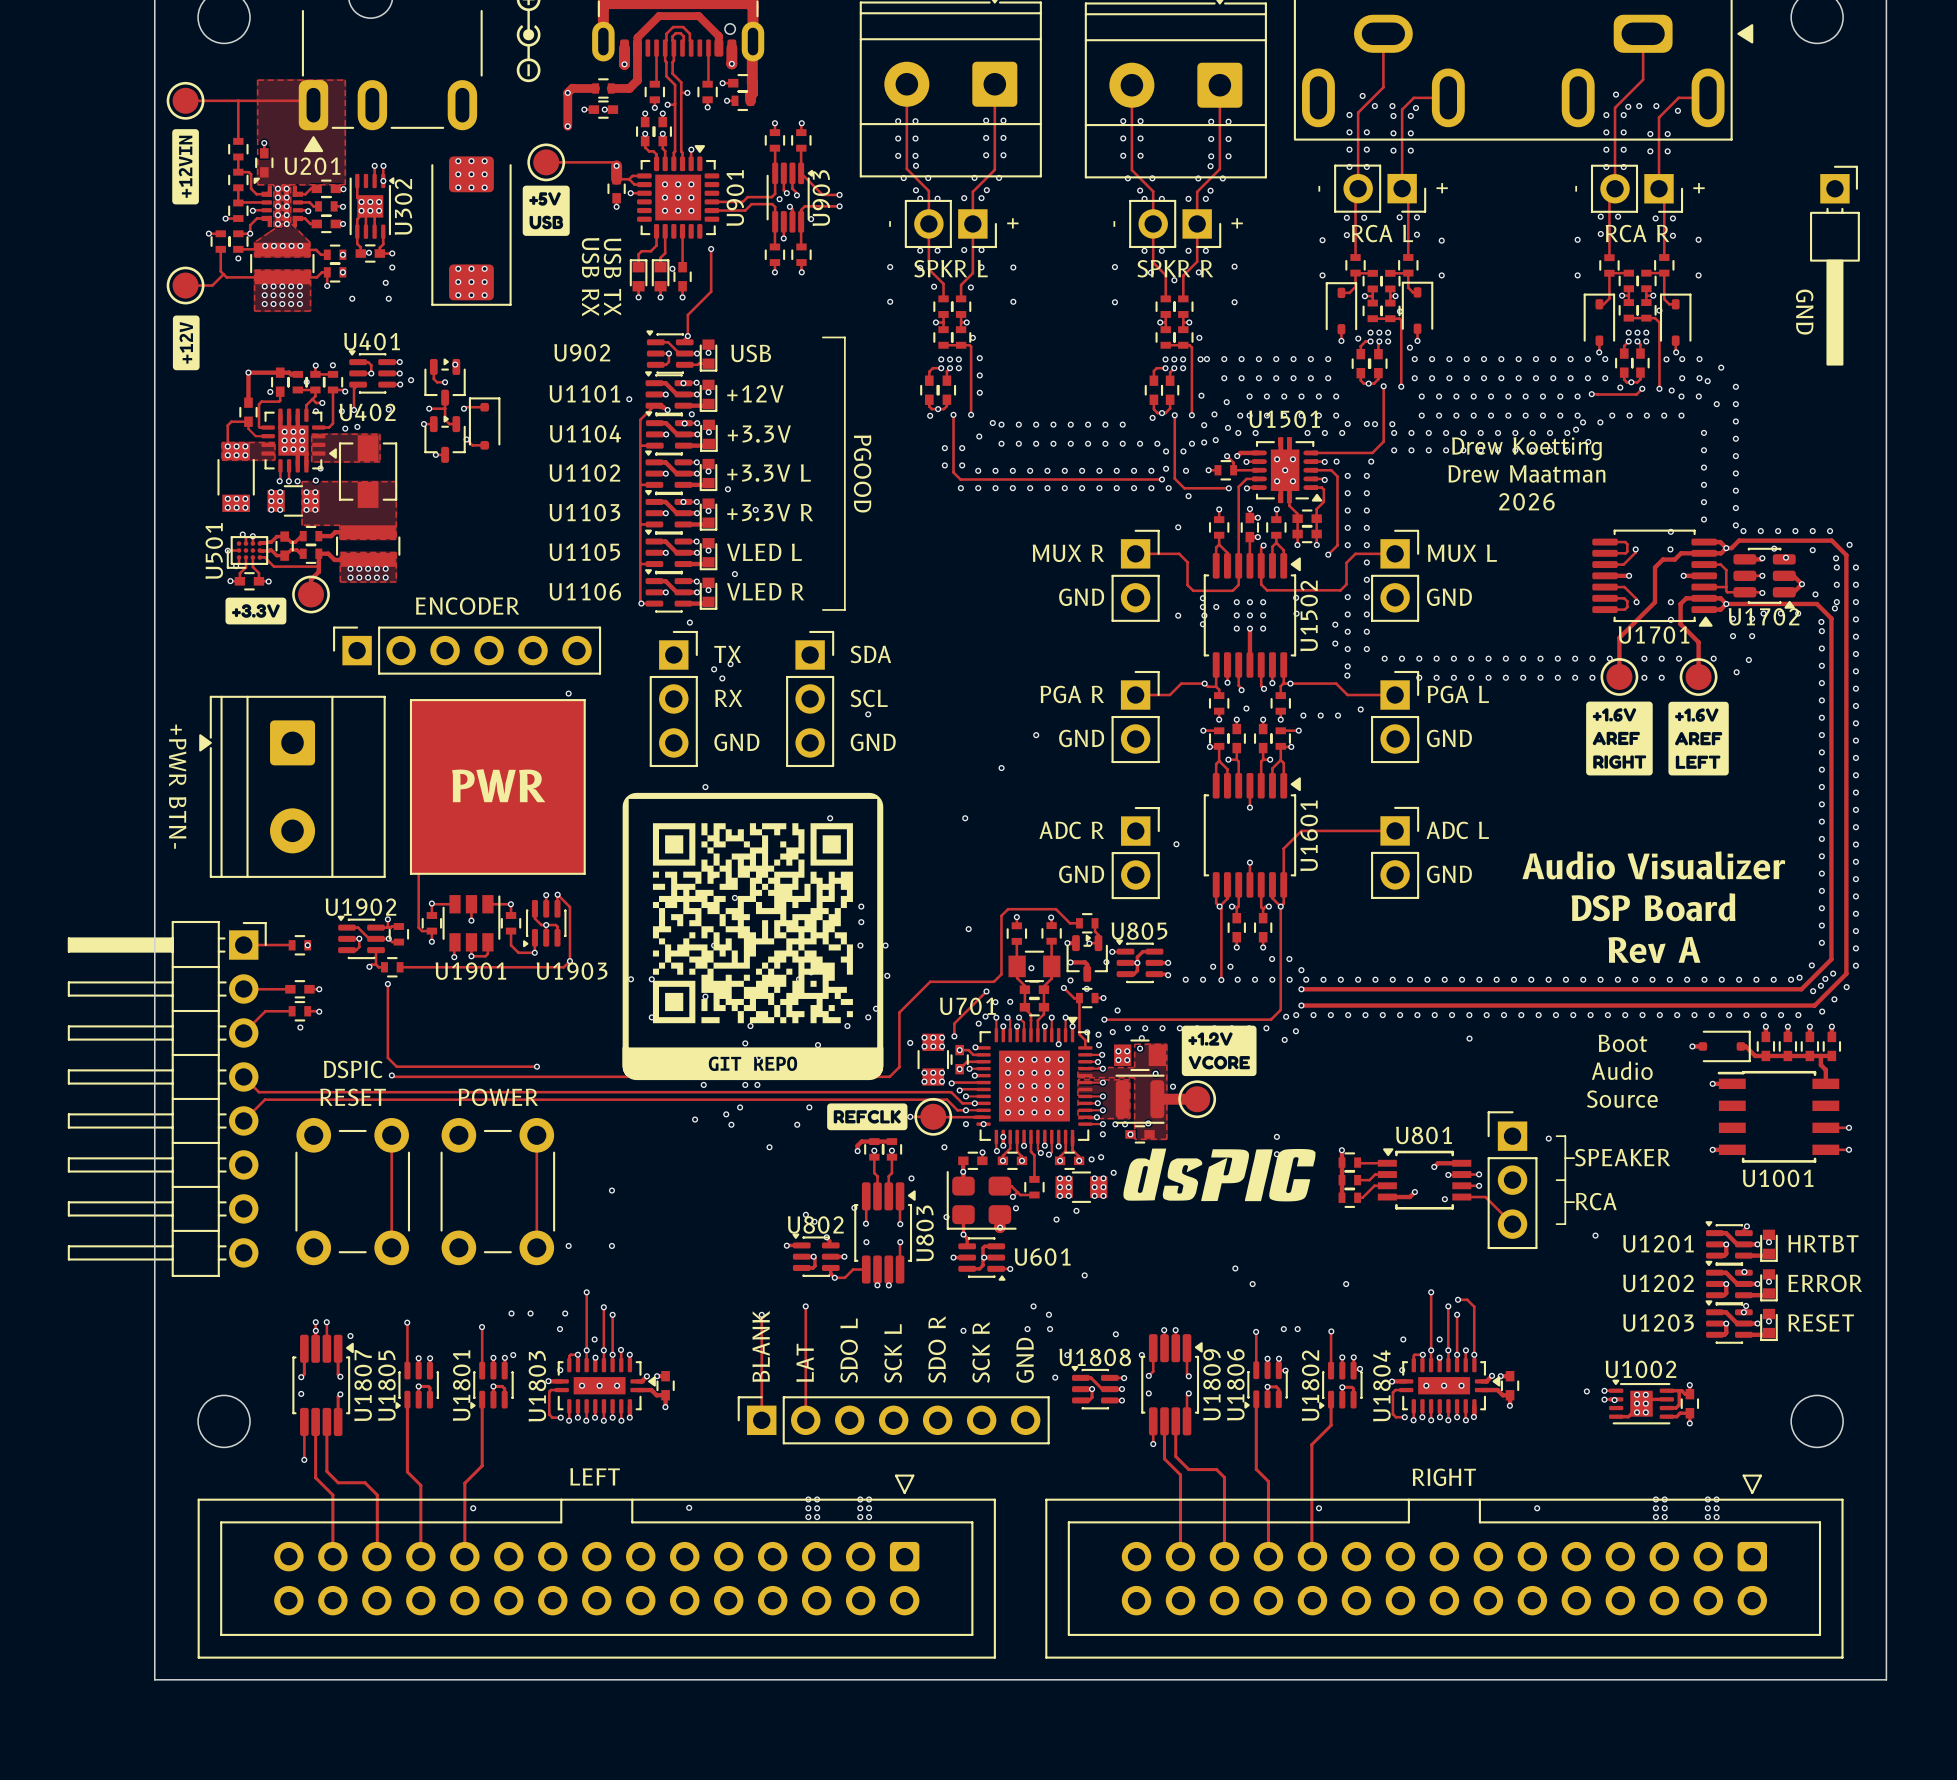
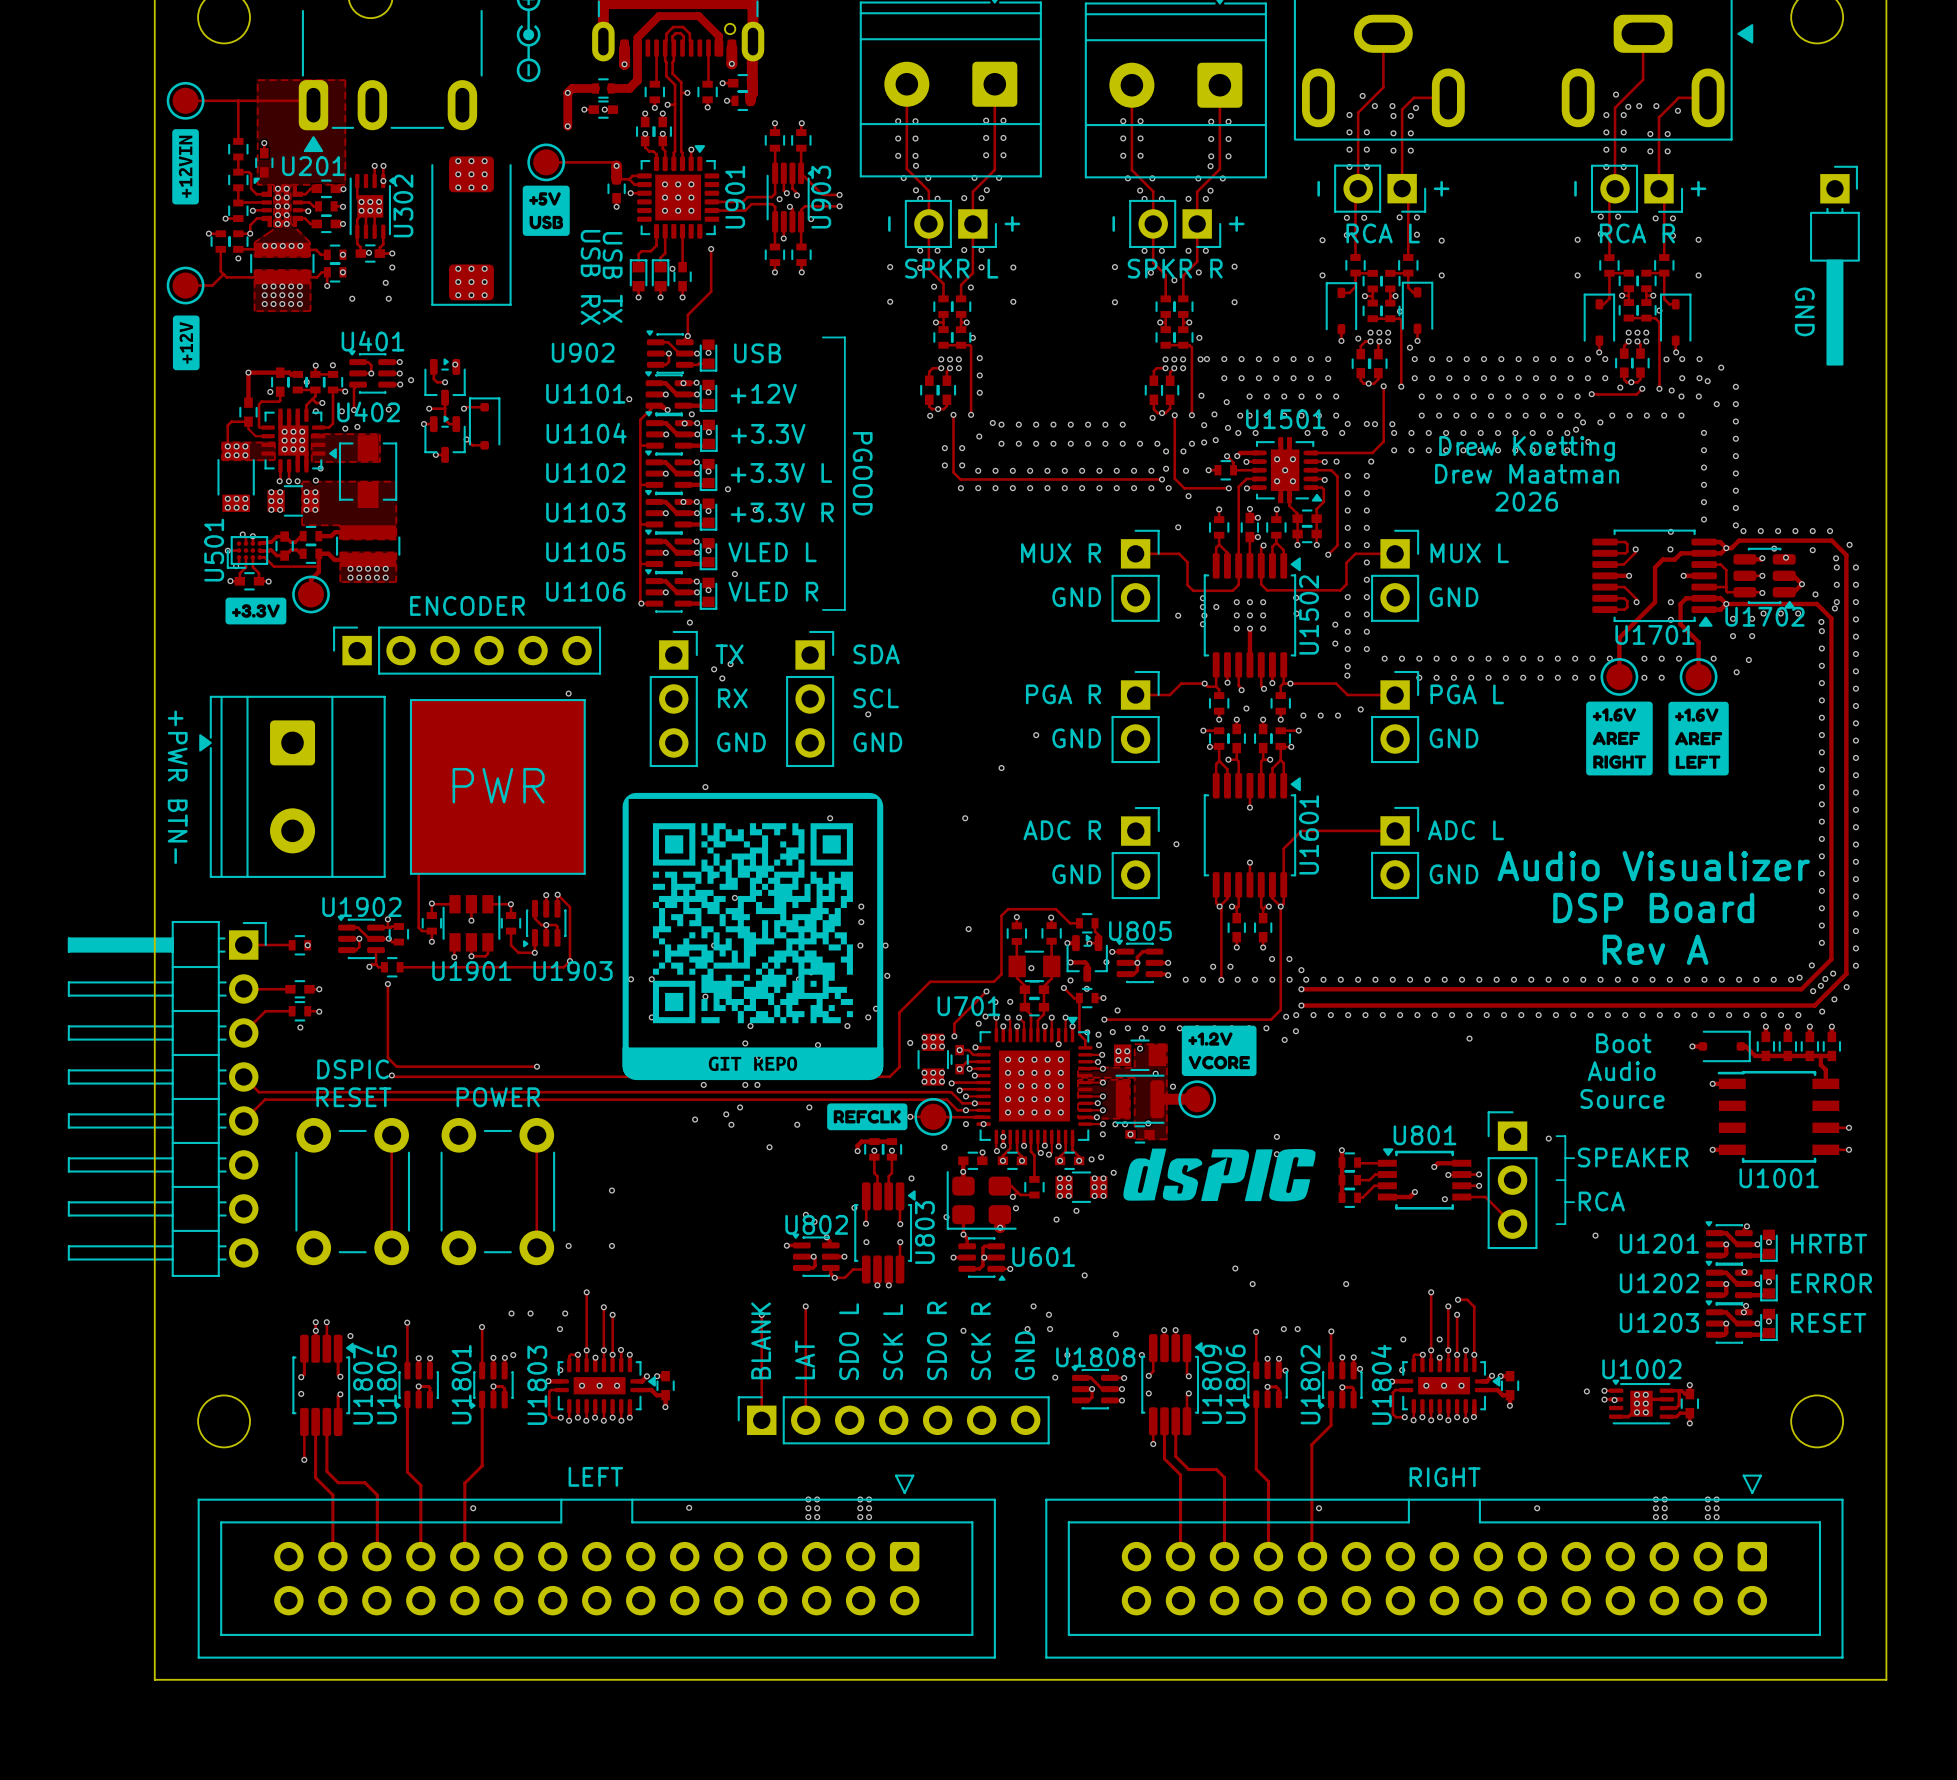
via: (594, 1339) -> none

